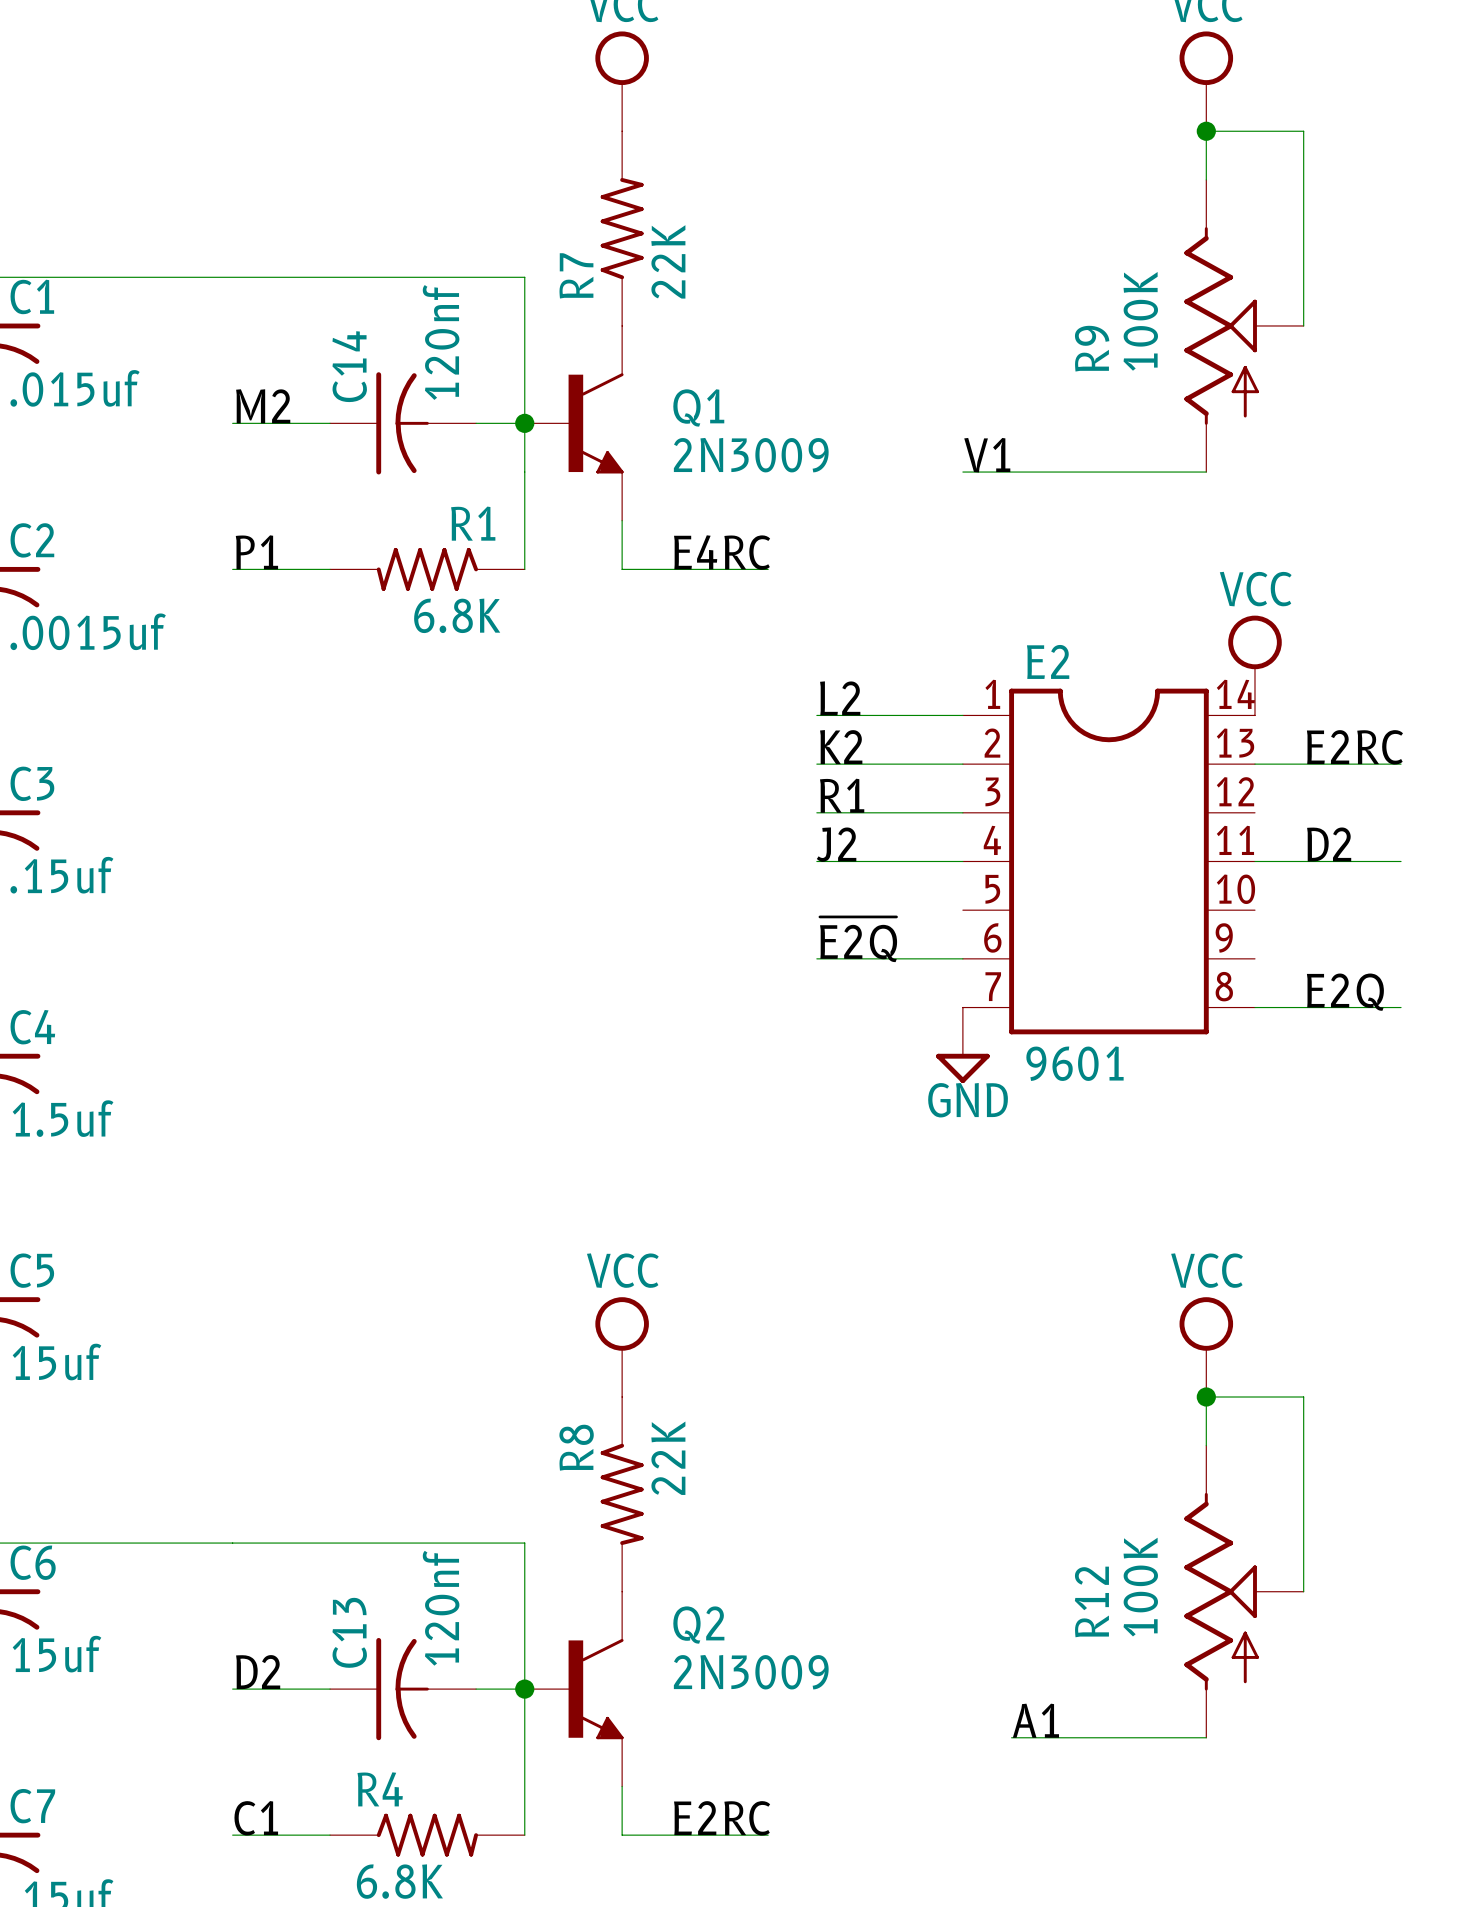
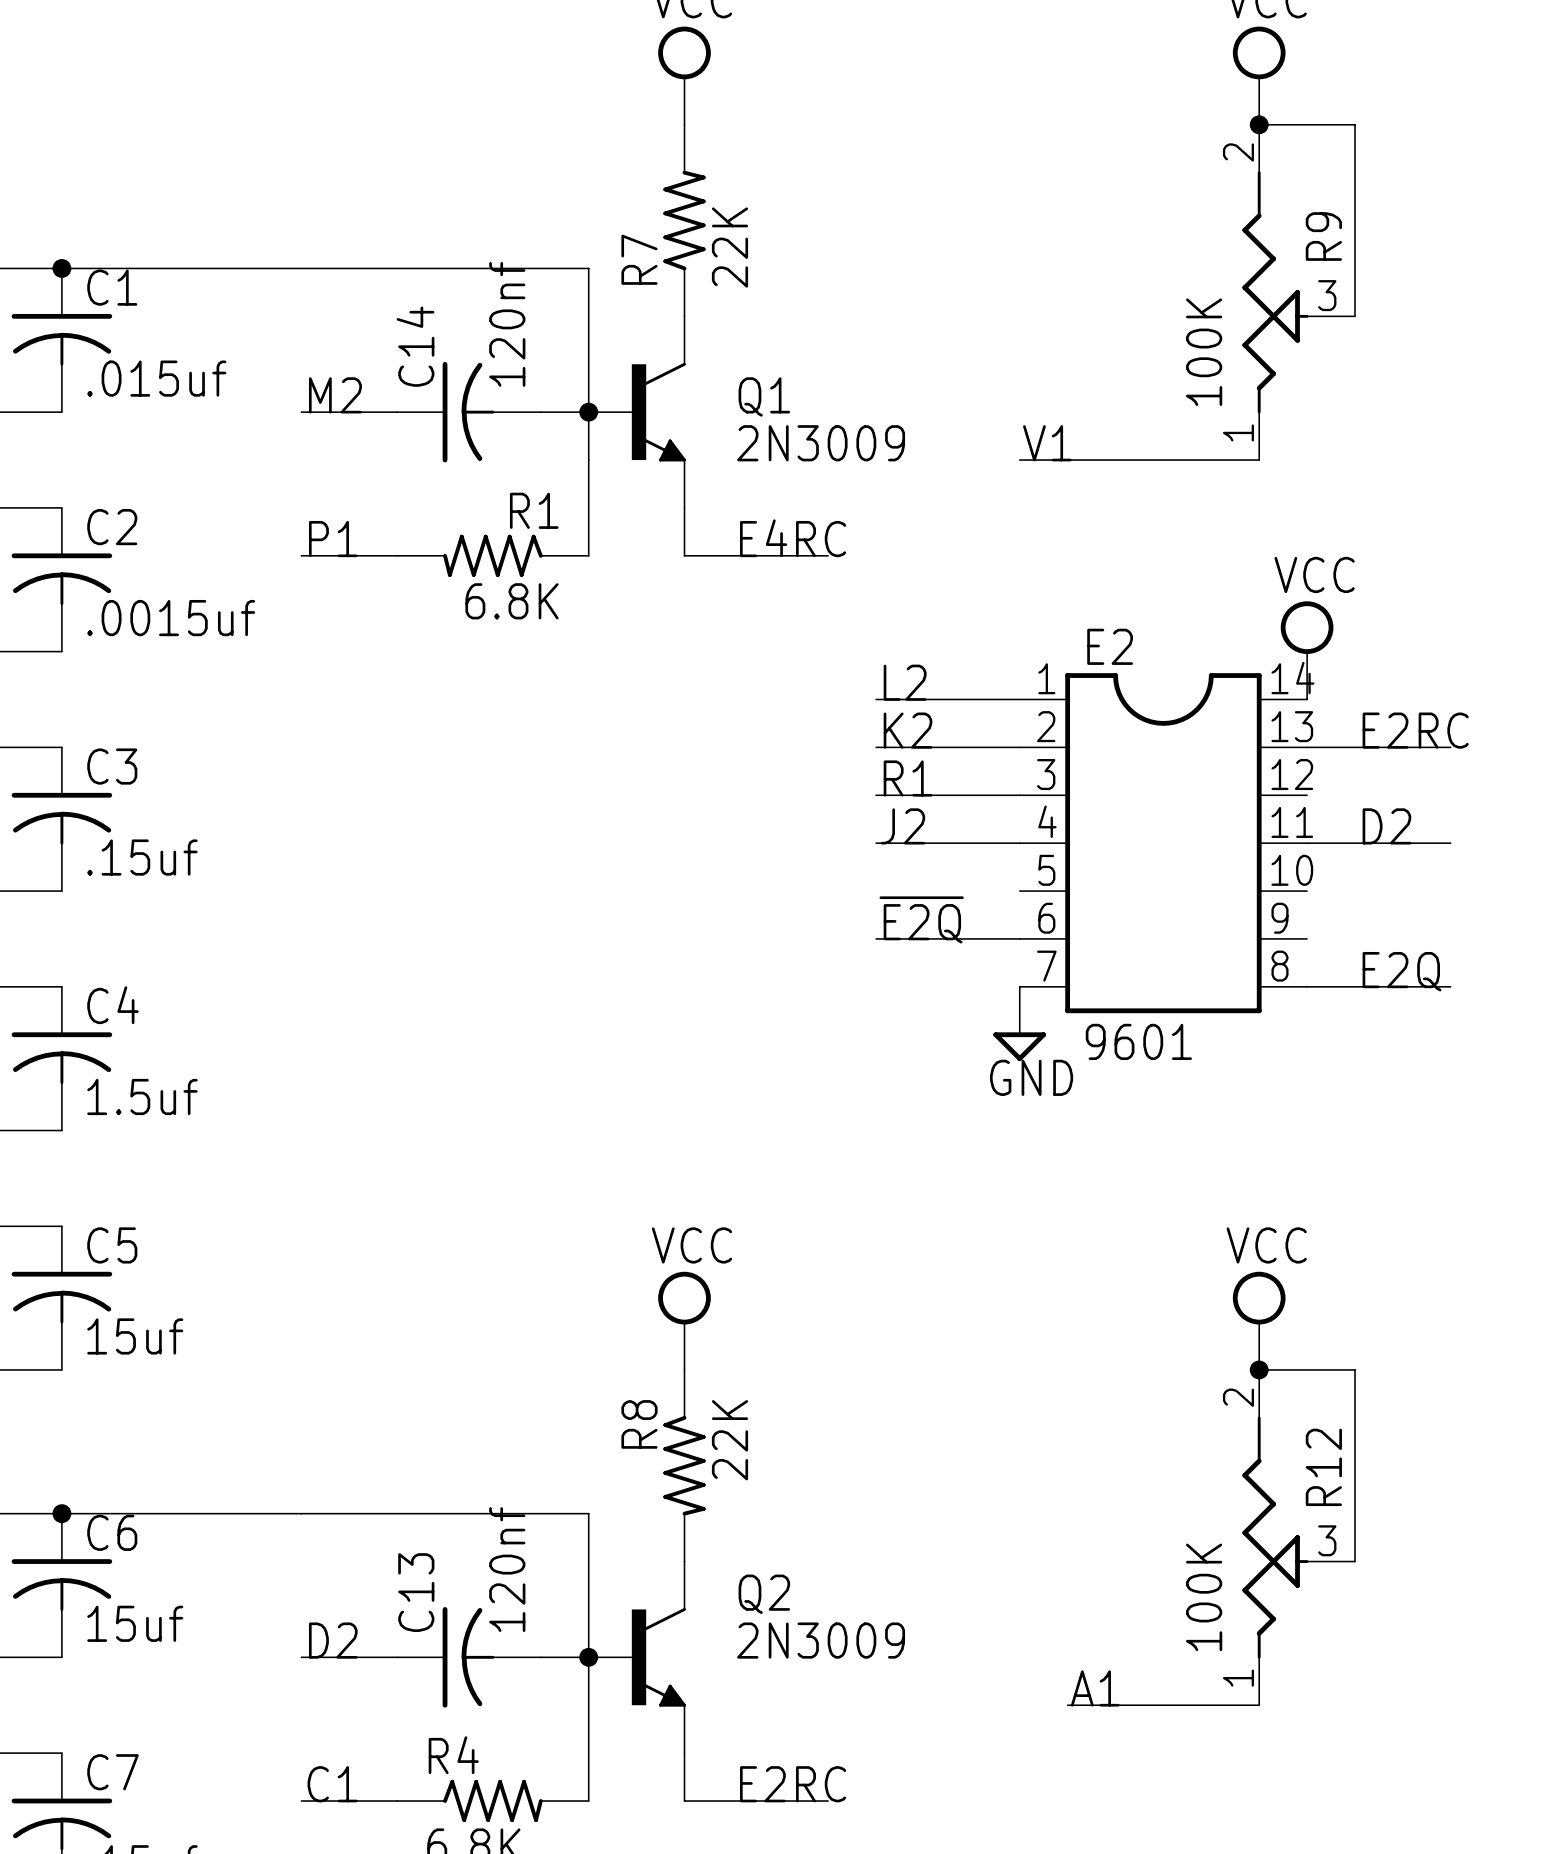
R9 symbol: [1184, 179, 1304, 473] -> [1242, 124, 1355, 461]
R9 value position: 100K (1140, 321) -> 100K (1204, 352)
R9 name position: R9 (1092, 348) -> R9 (1323, 236)
R12 symbol: [1184, 1445, 1304, 1738] -> [1242, 1369, 1355, 1706]
R12 value position: 100K (1140, 1587) -> 100K (1204, 1597)
R12 name position: R12 (1091, 1601) -> R12 (1323, 1467)

